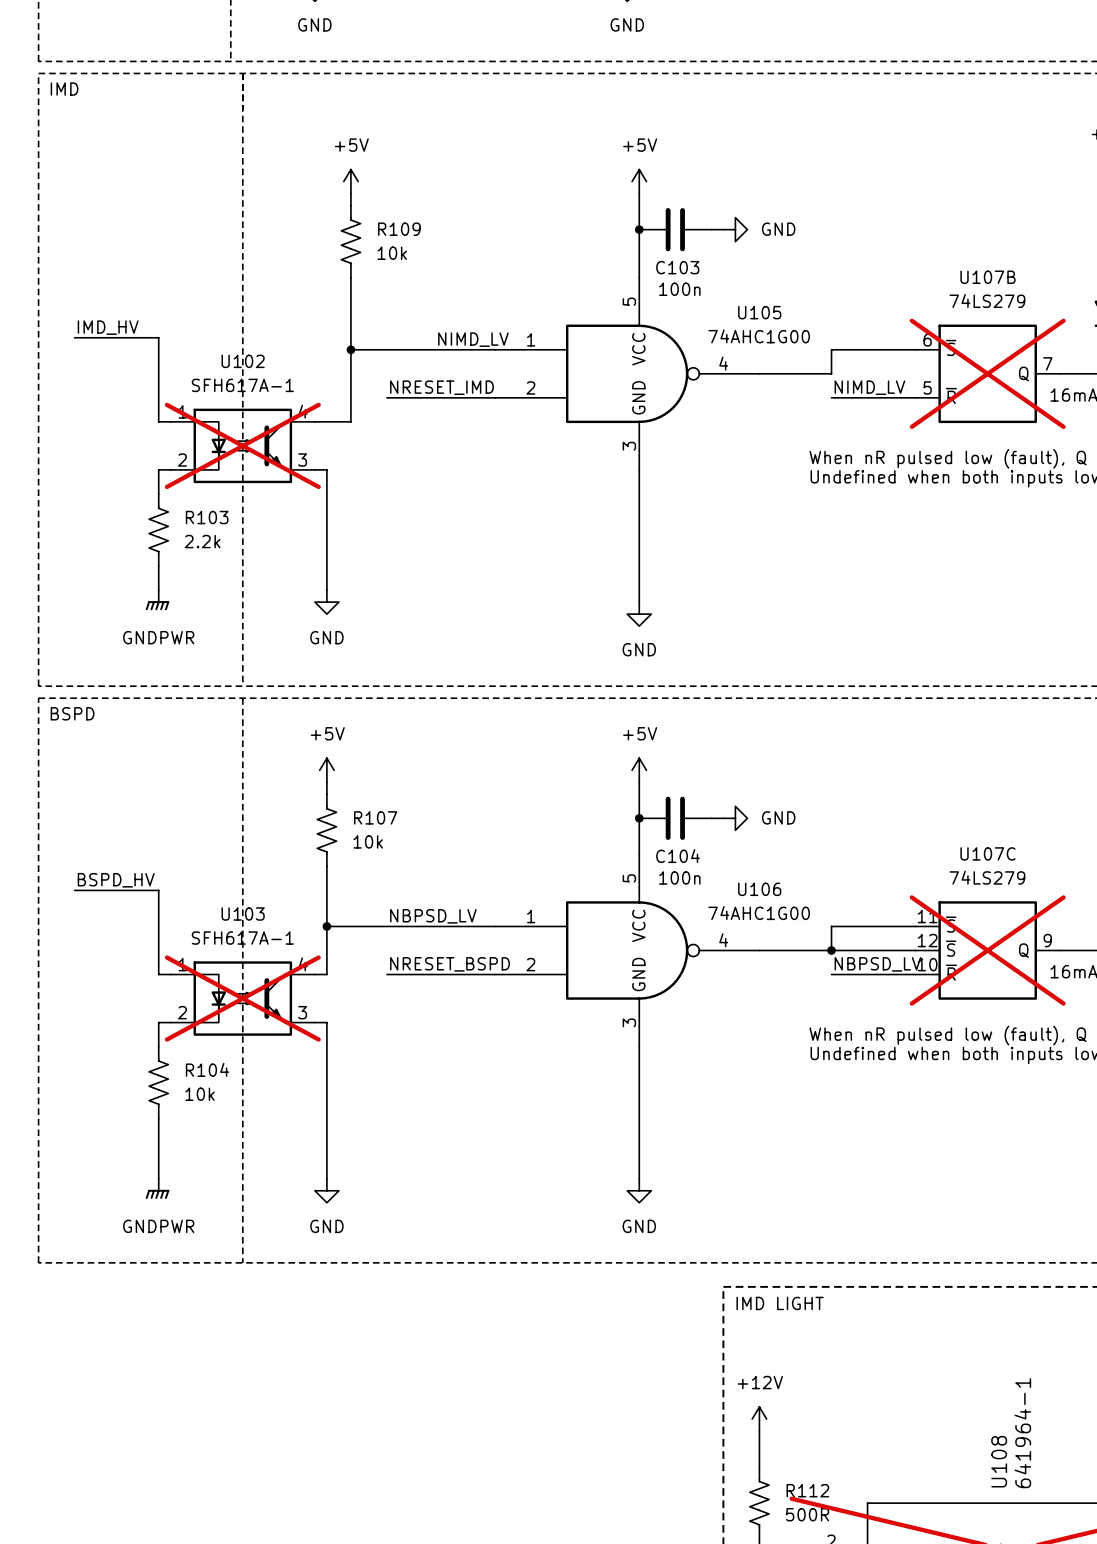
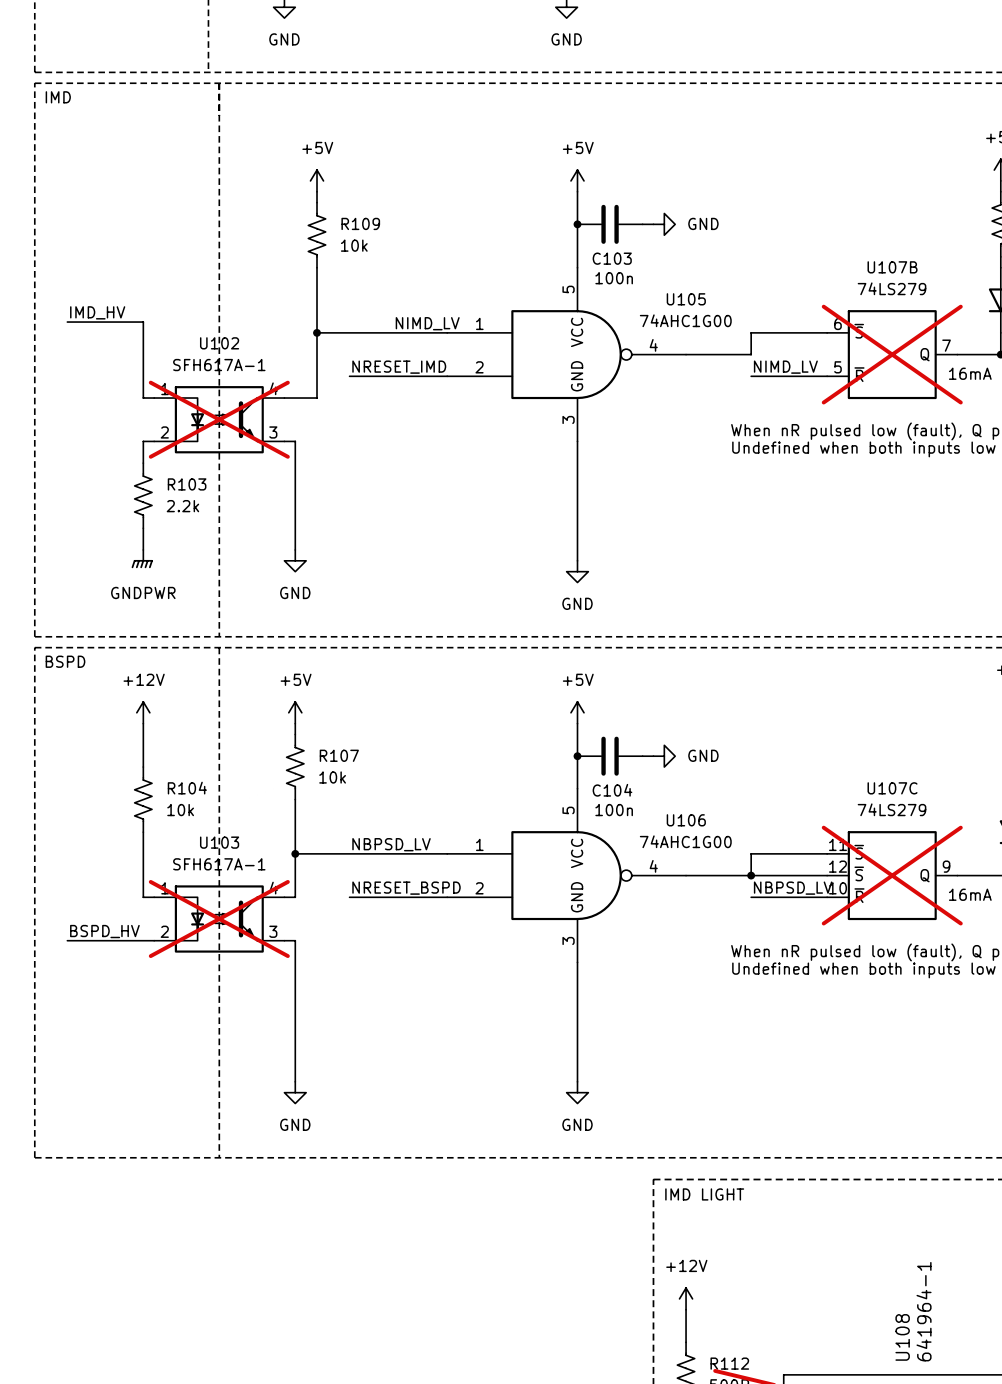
power symbol: none -> +12V (143, 712)
wire: none -> (143, 723) (143, 767)
label position: BSPD_HV (116, 880) -> BSPD_HV (104, 931)
wire: (74, 890) (158, 890) (158, 902) -> none
wire: (158, 1022) (158, 1046) -> (143, 940) (67, 940)
R104 position: (158, 1082) -> (143, 799)
wire: (158, 1118) (158, 1178) -> none
power symbol: GNDPWR (157, 1188) -> none

